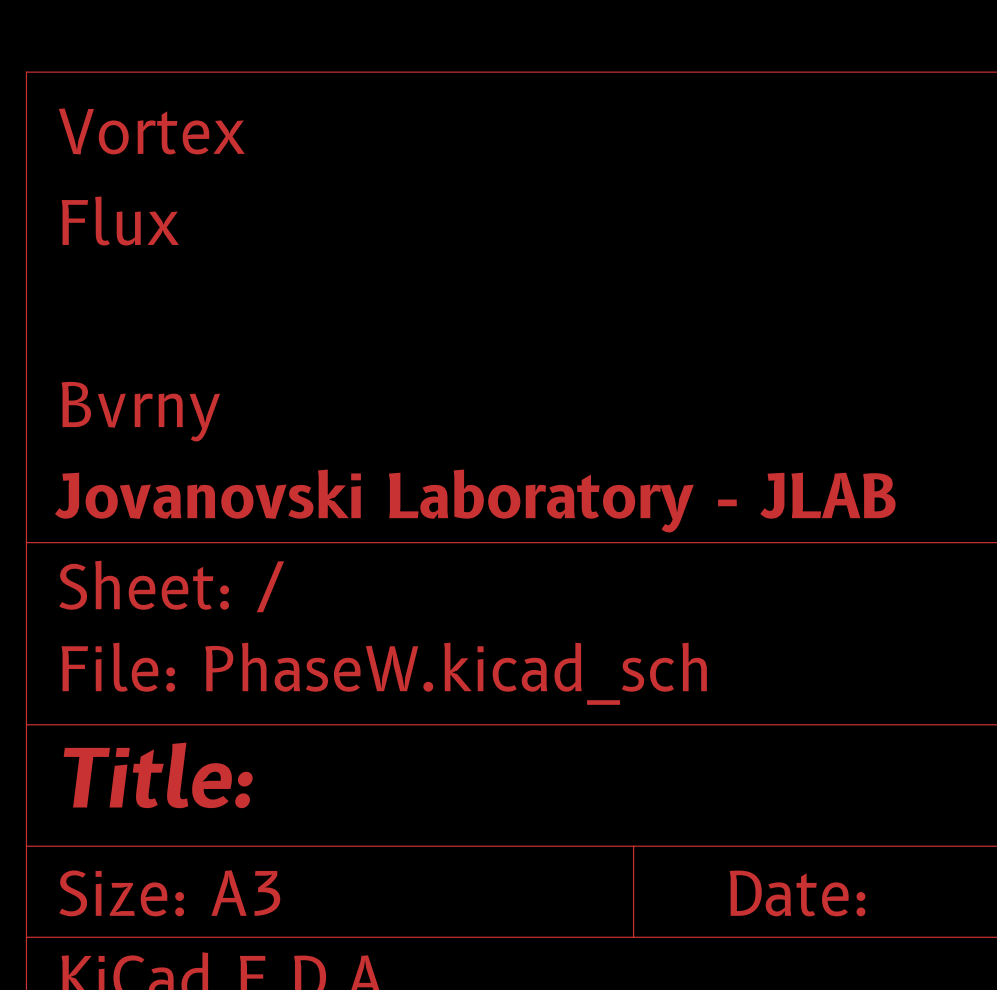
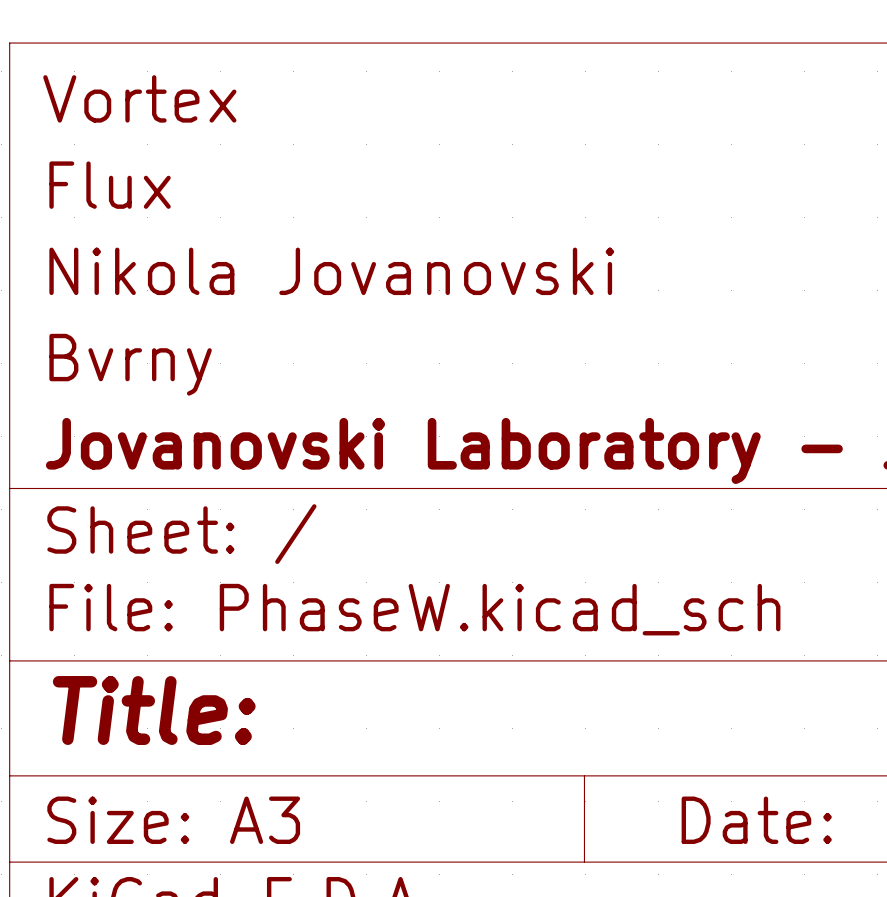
title block: none -> Nikola Jovanovski (331, 271)

